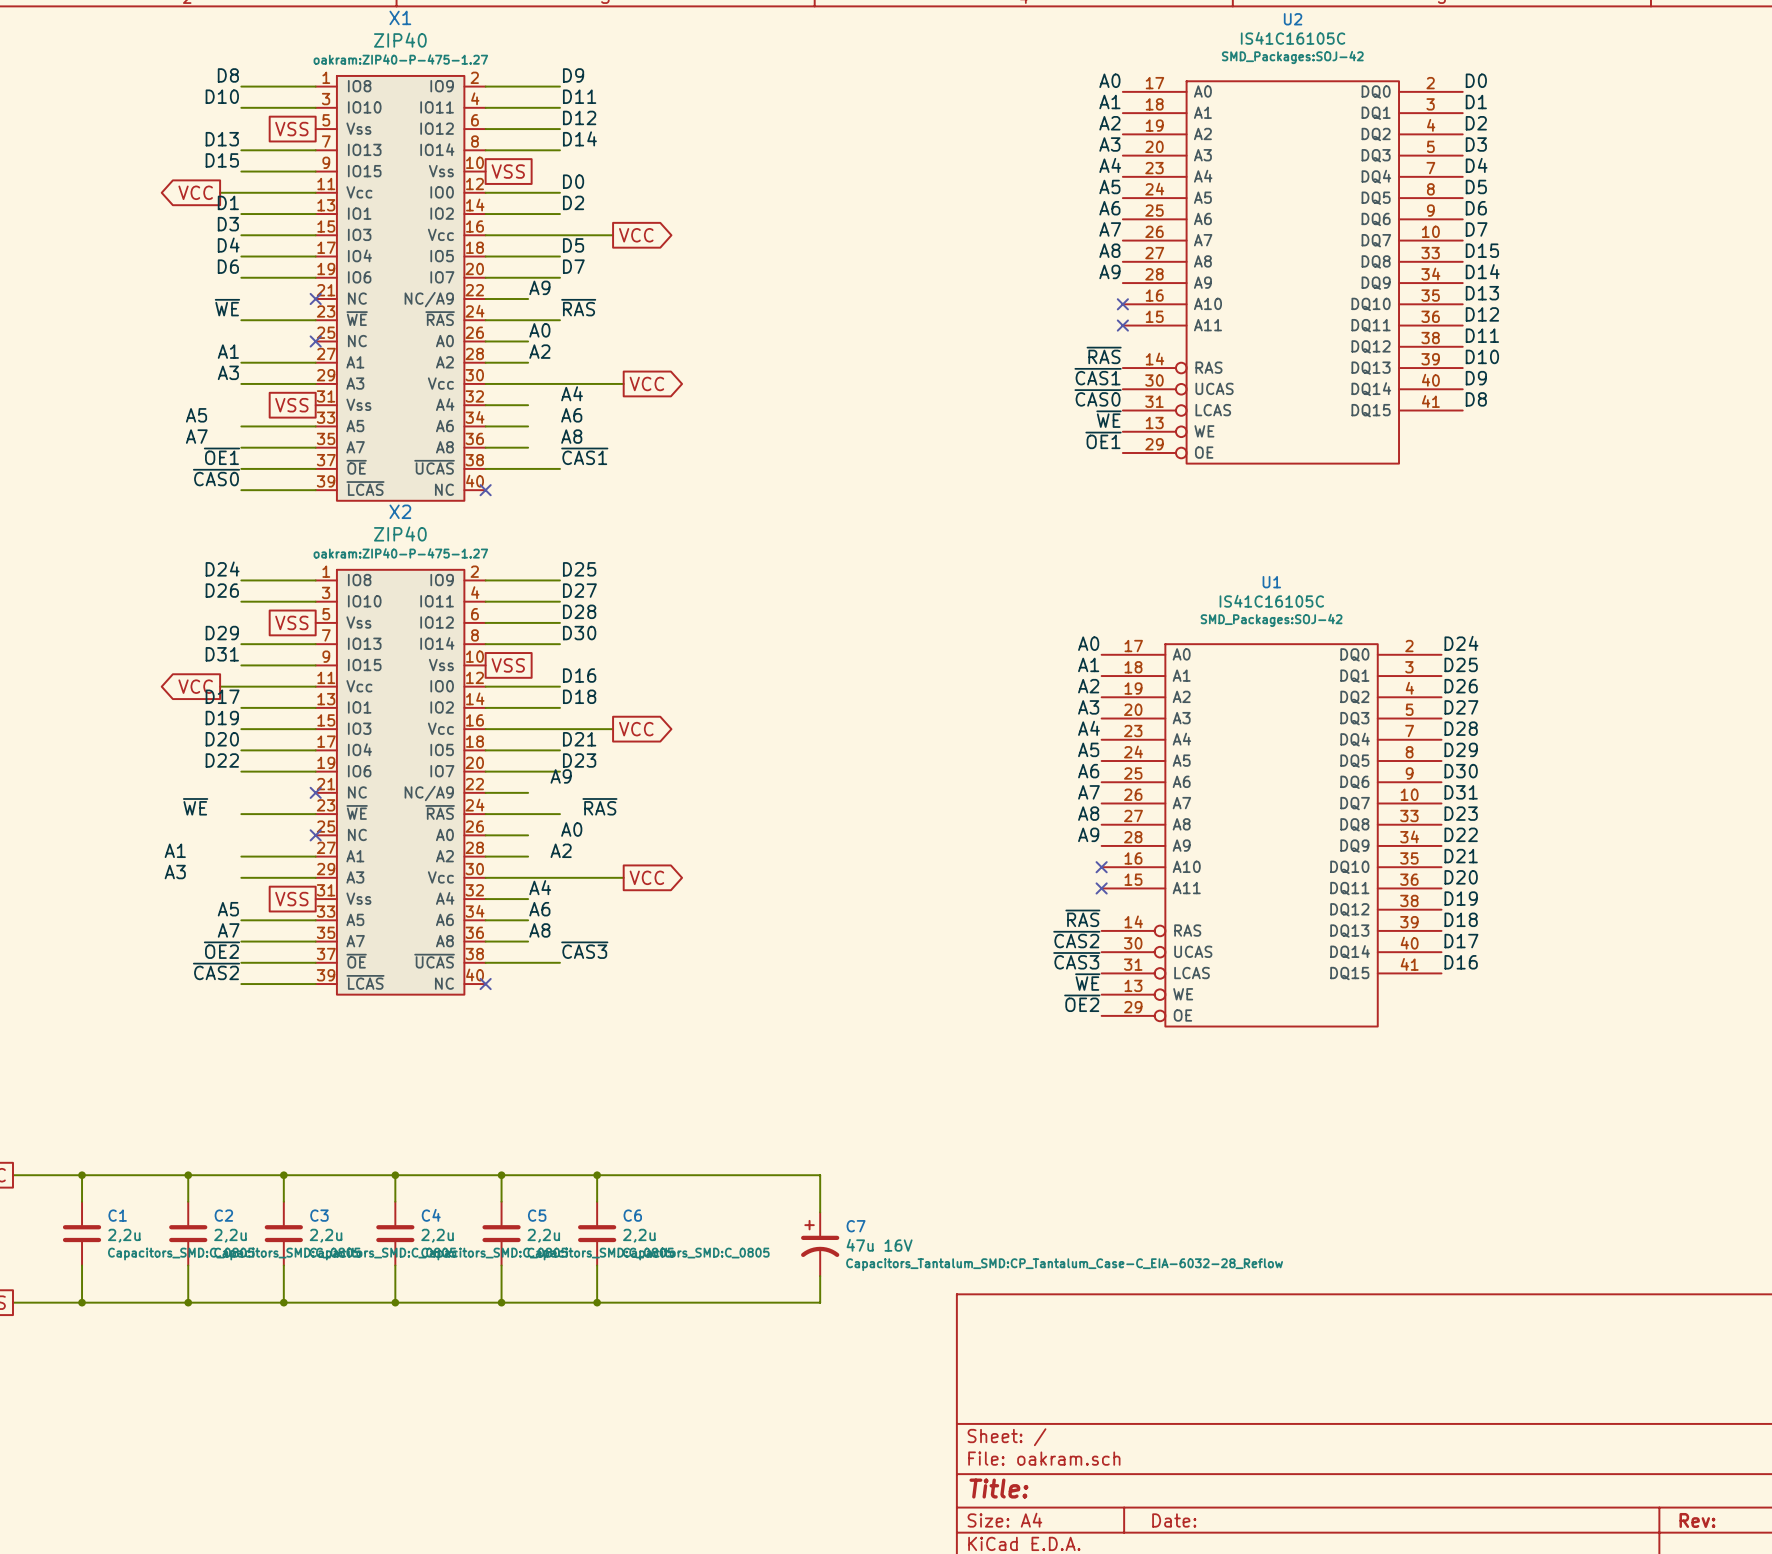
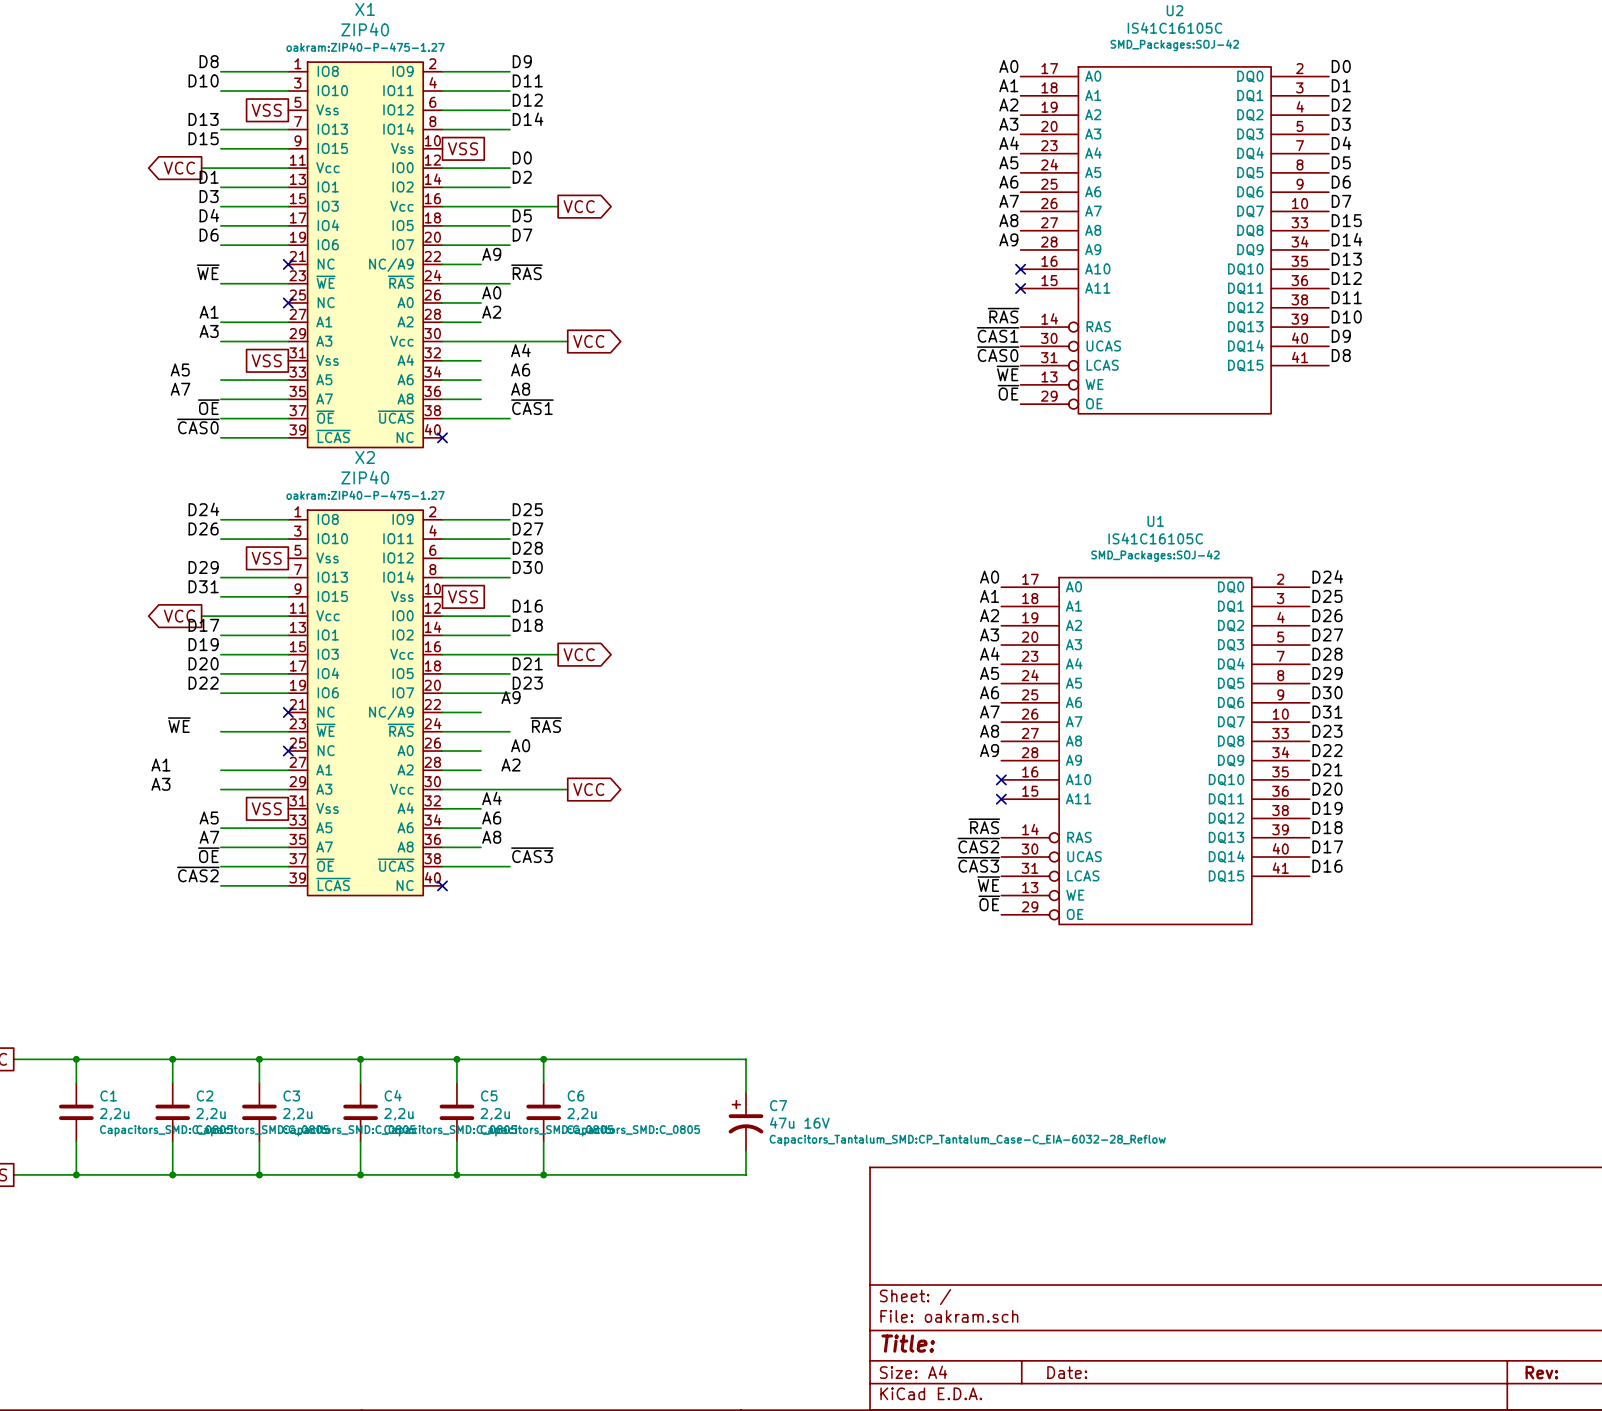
label: ~{OE1} (1103, 440) -> ~{OE} (1008, 392)
label: ~{OE1} (221, 456) -> ~{OE} (208, 407)
label: ~{OE2} (221, 950) -> ~{OE} (208, 855)
label: ~{OE2} (1082, 1003) -> ~{OE} (989, 903)

